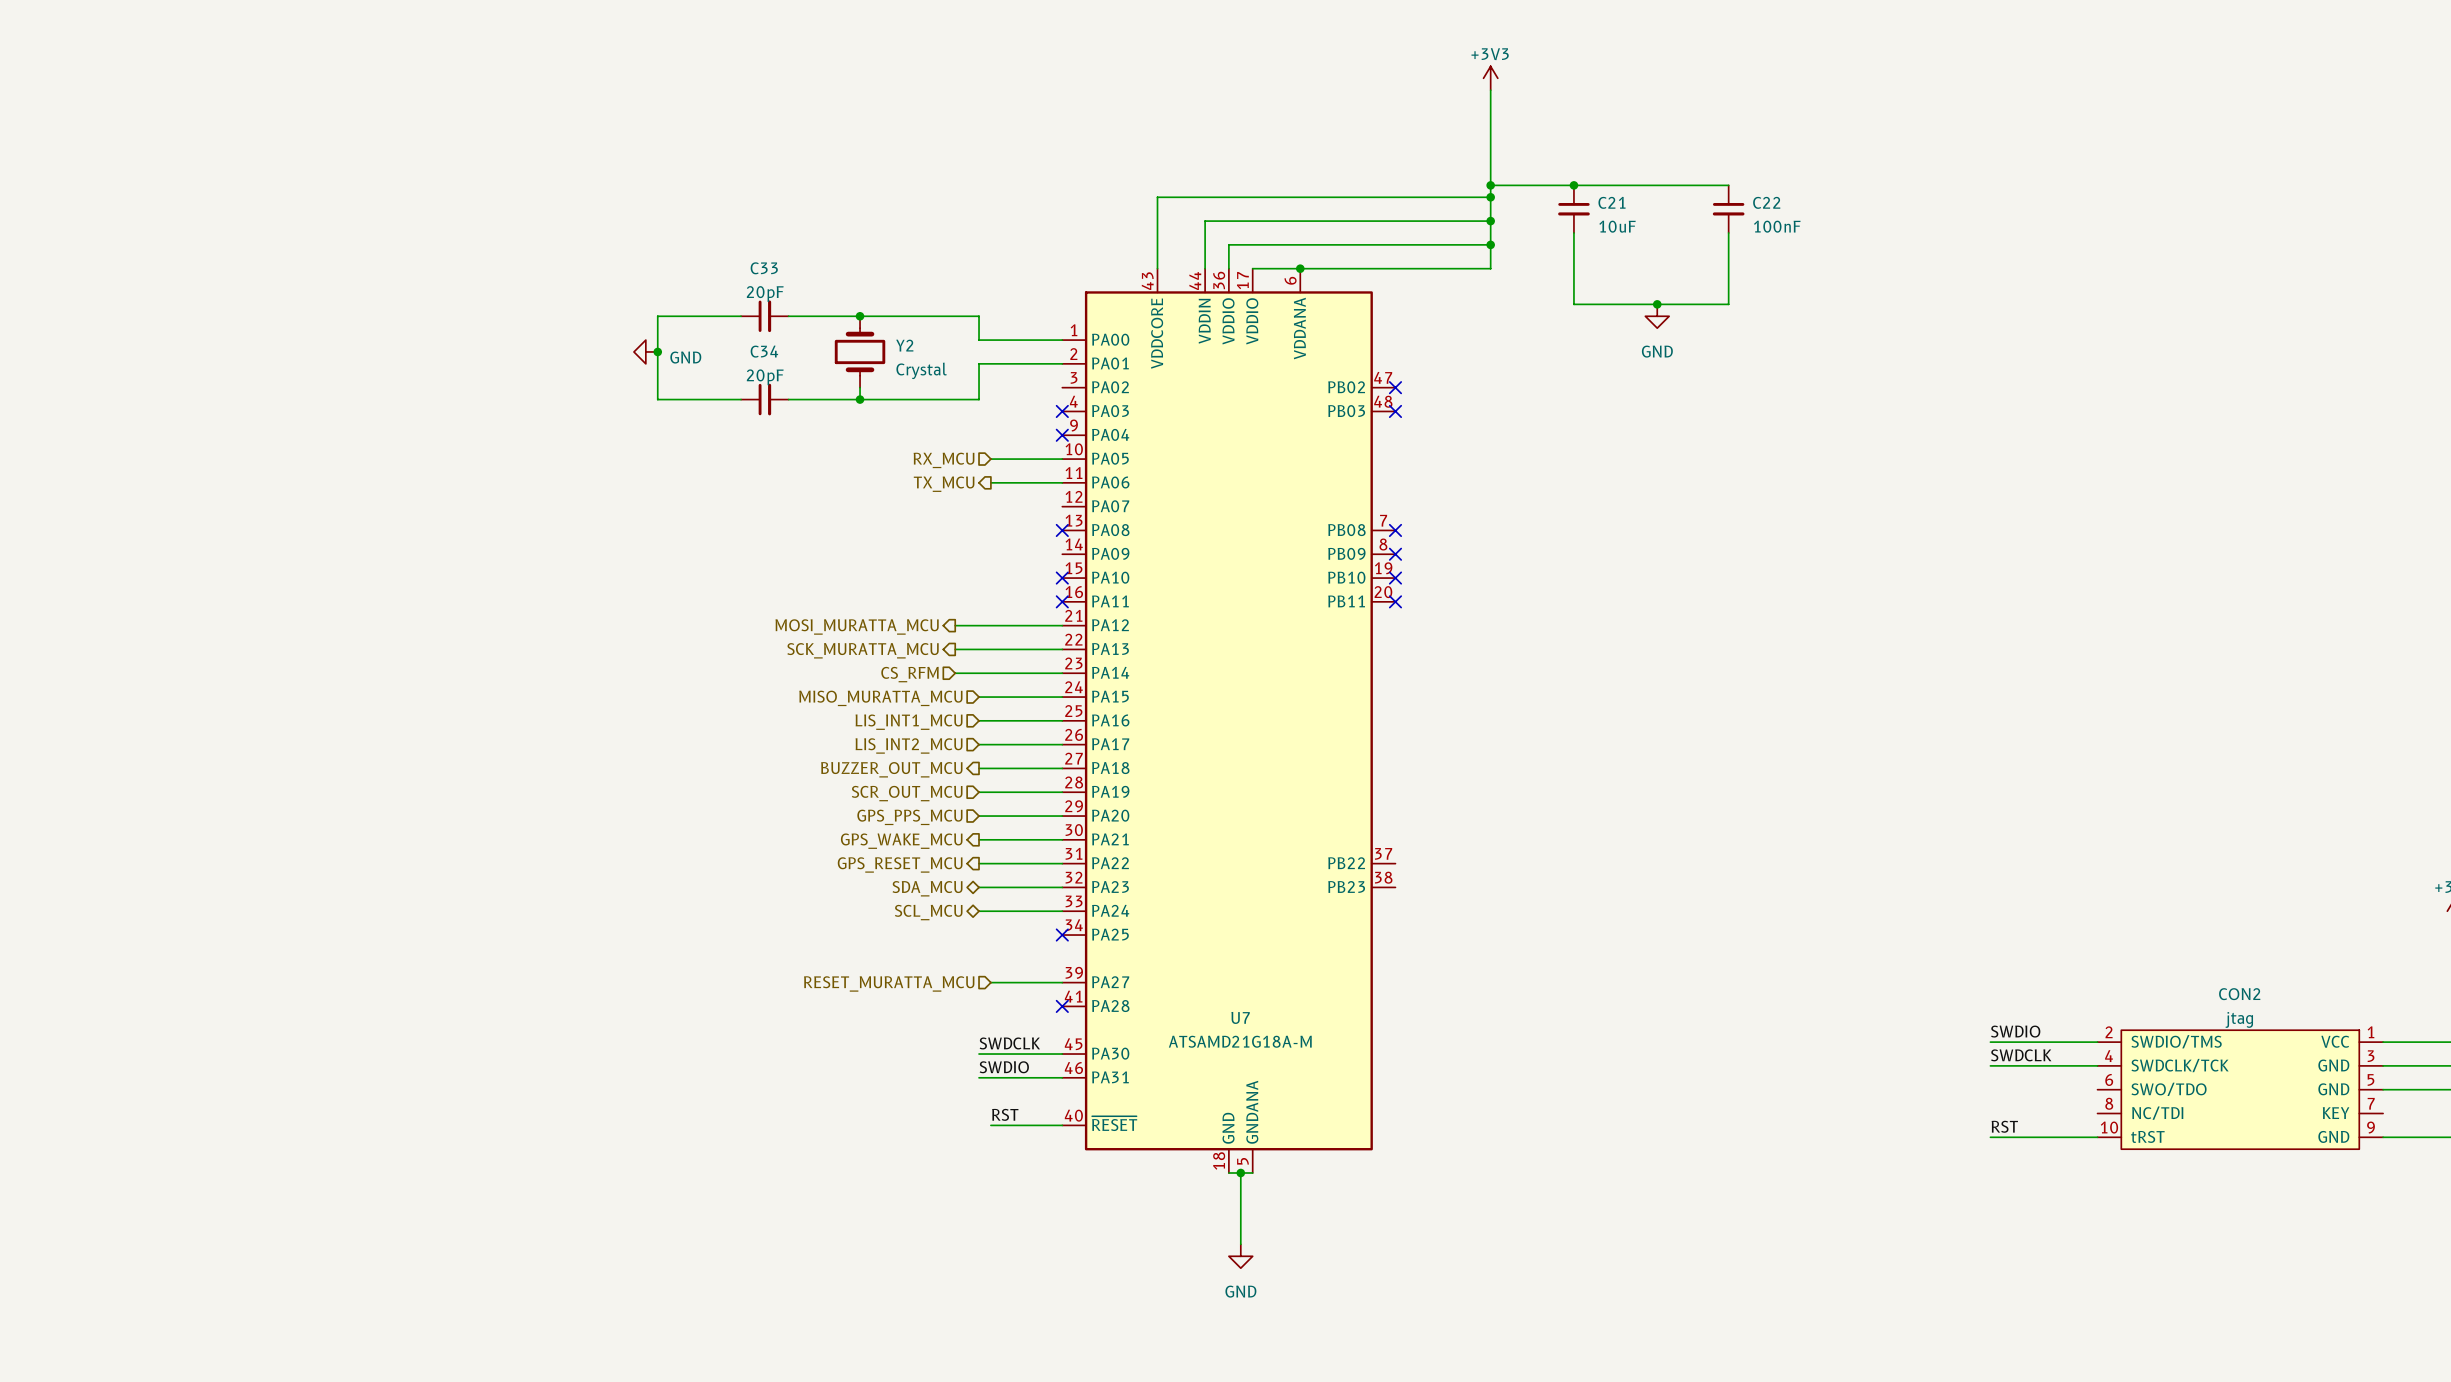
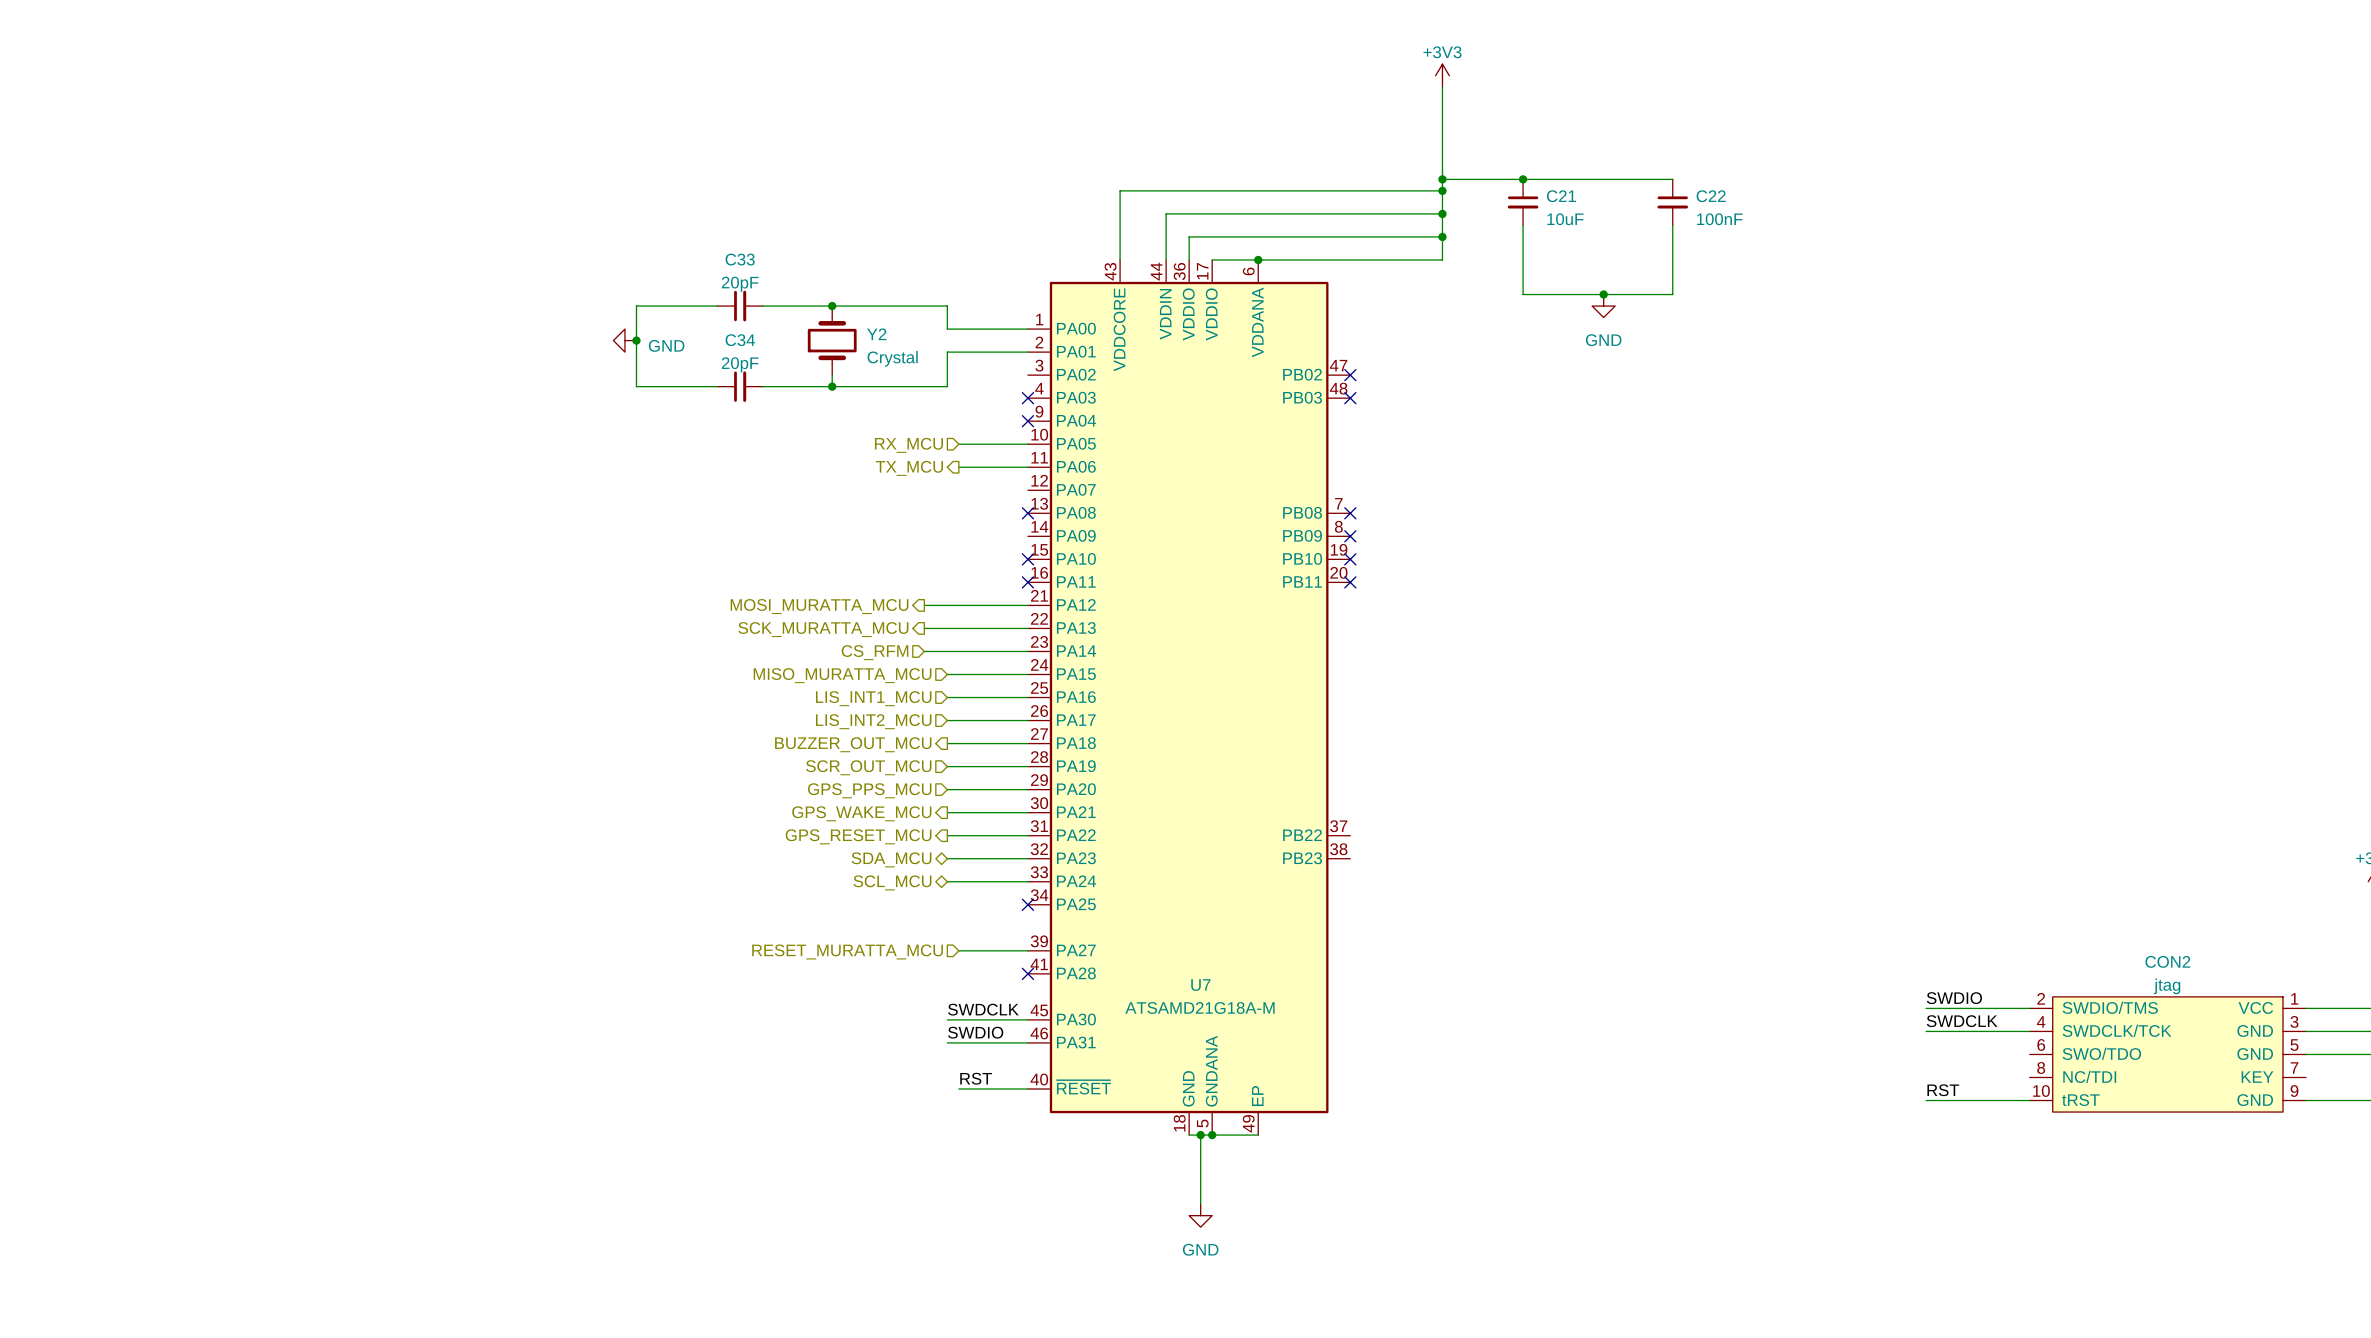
U7 symbol: [1062, 268, 1396, 1174] -> [1027, 259, 1351, 1136]
wire: none -> (1212, 1135) (1258, 1135)
junction: none -> (1212, 1135)

